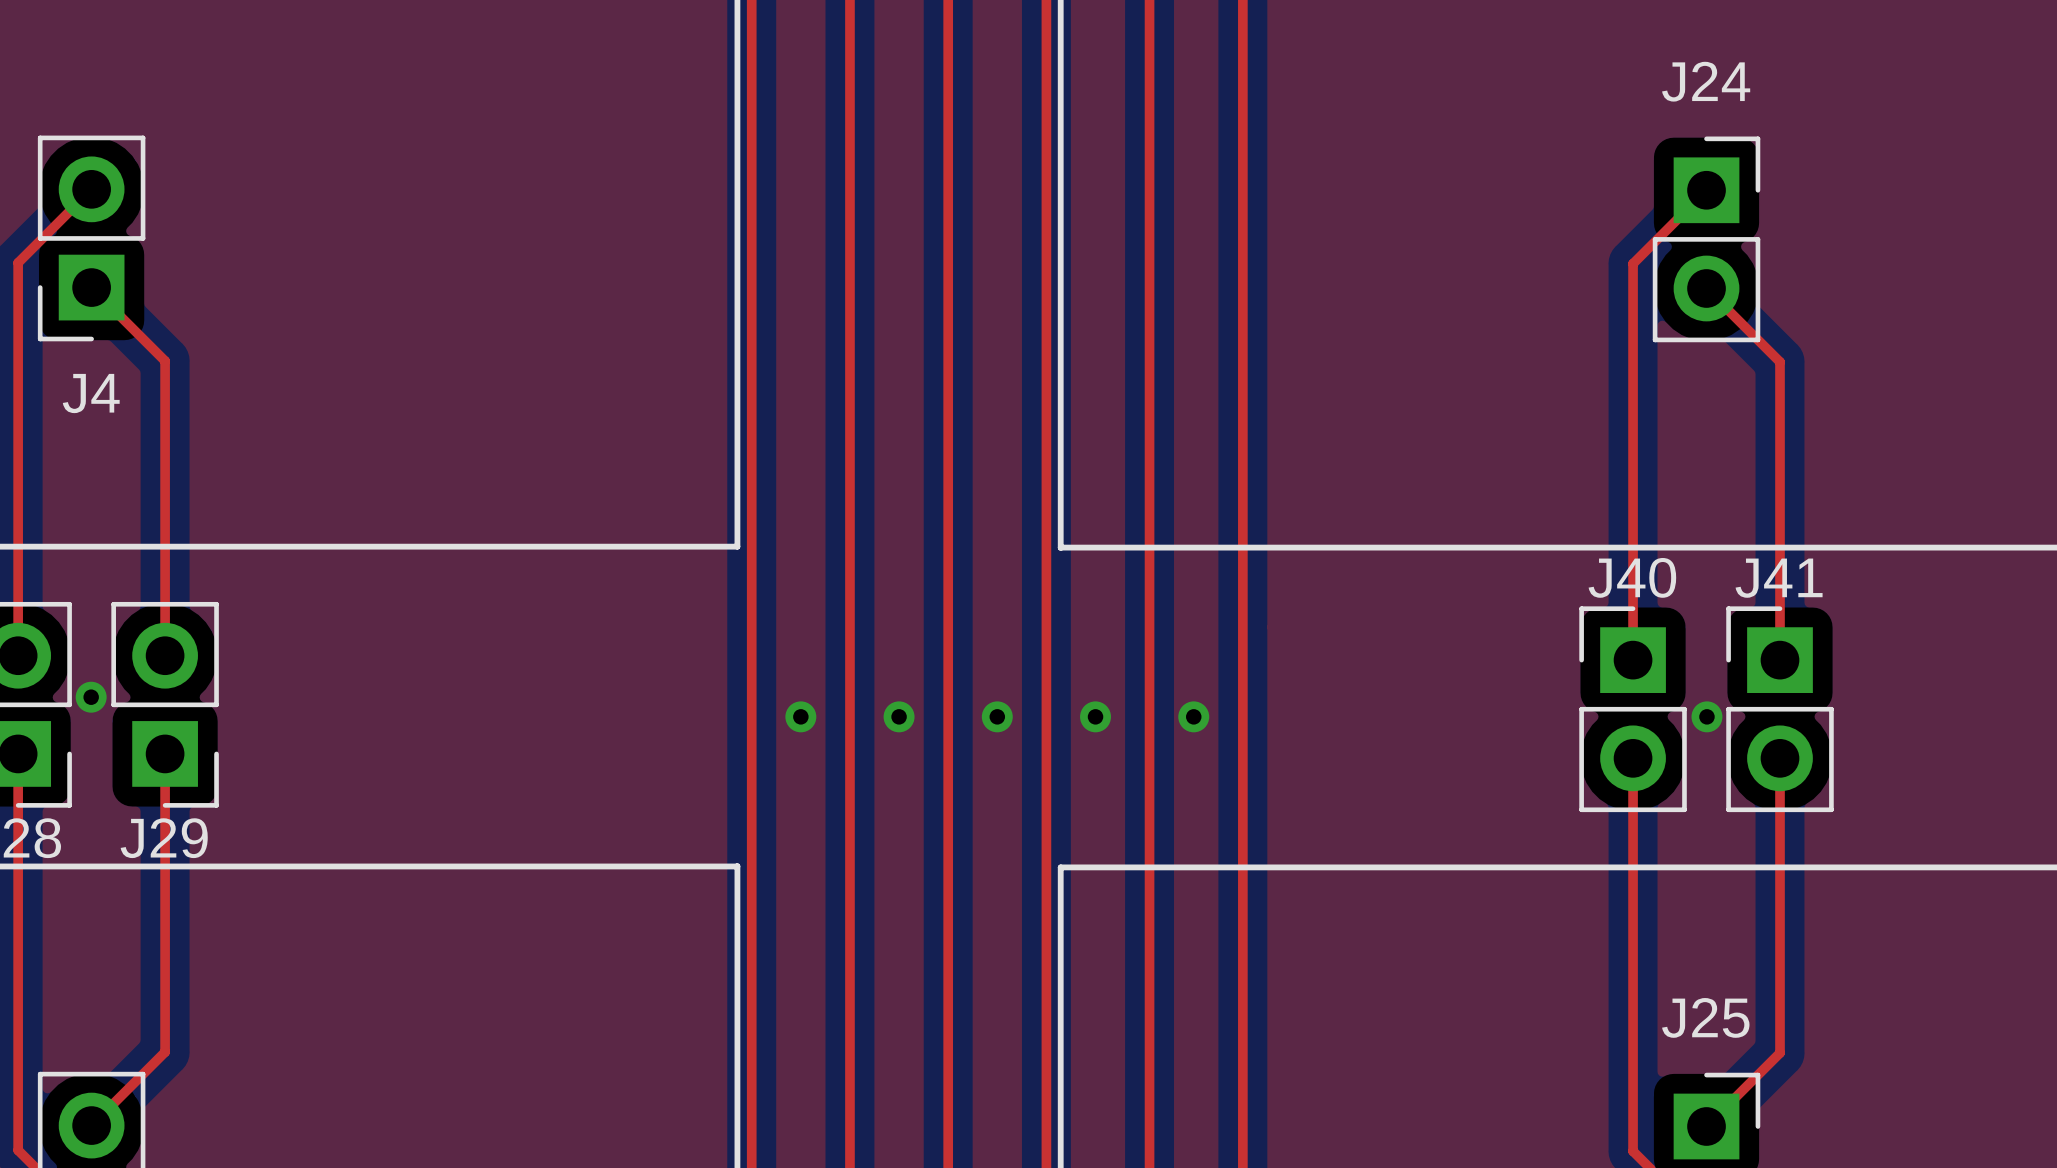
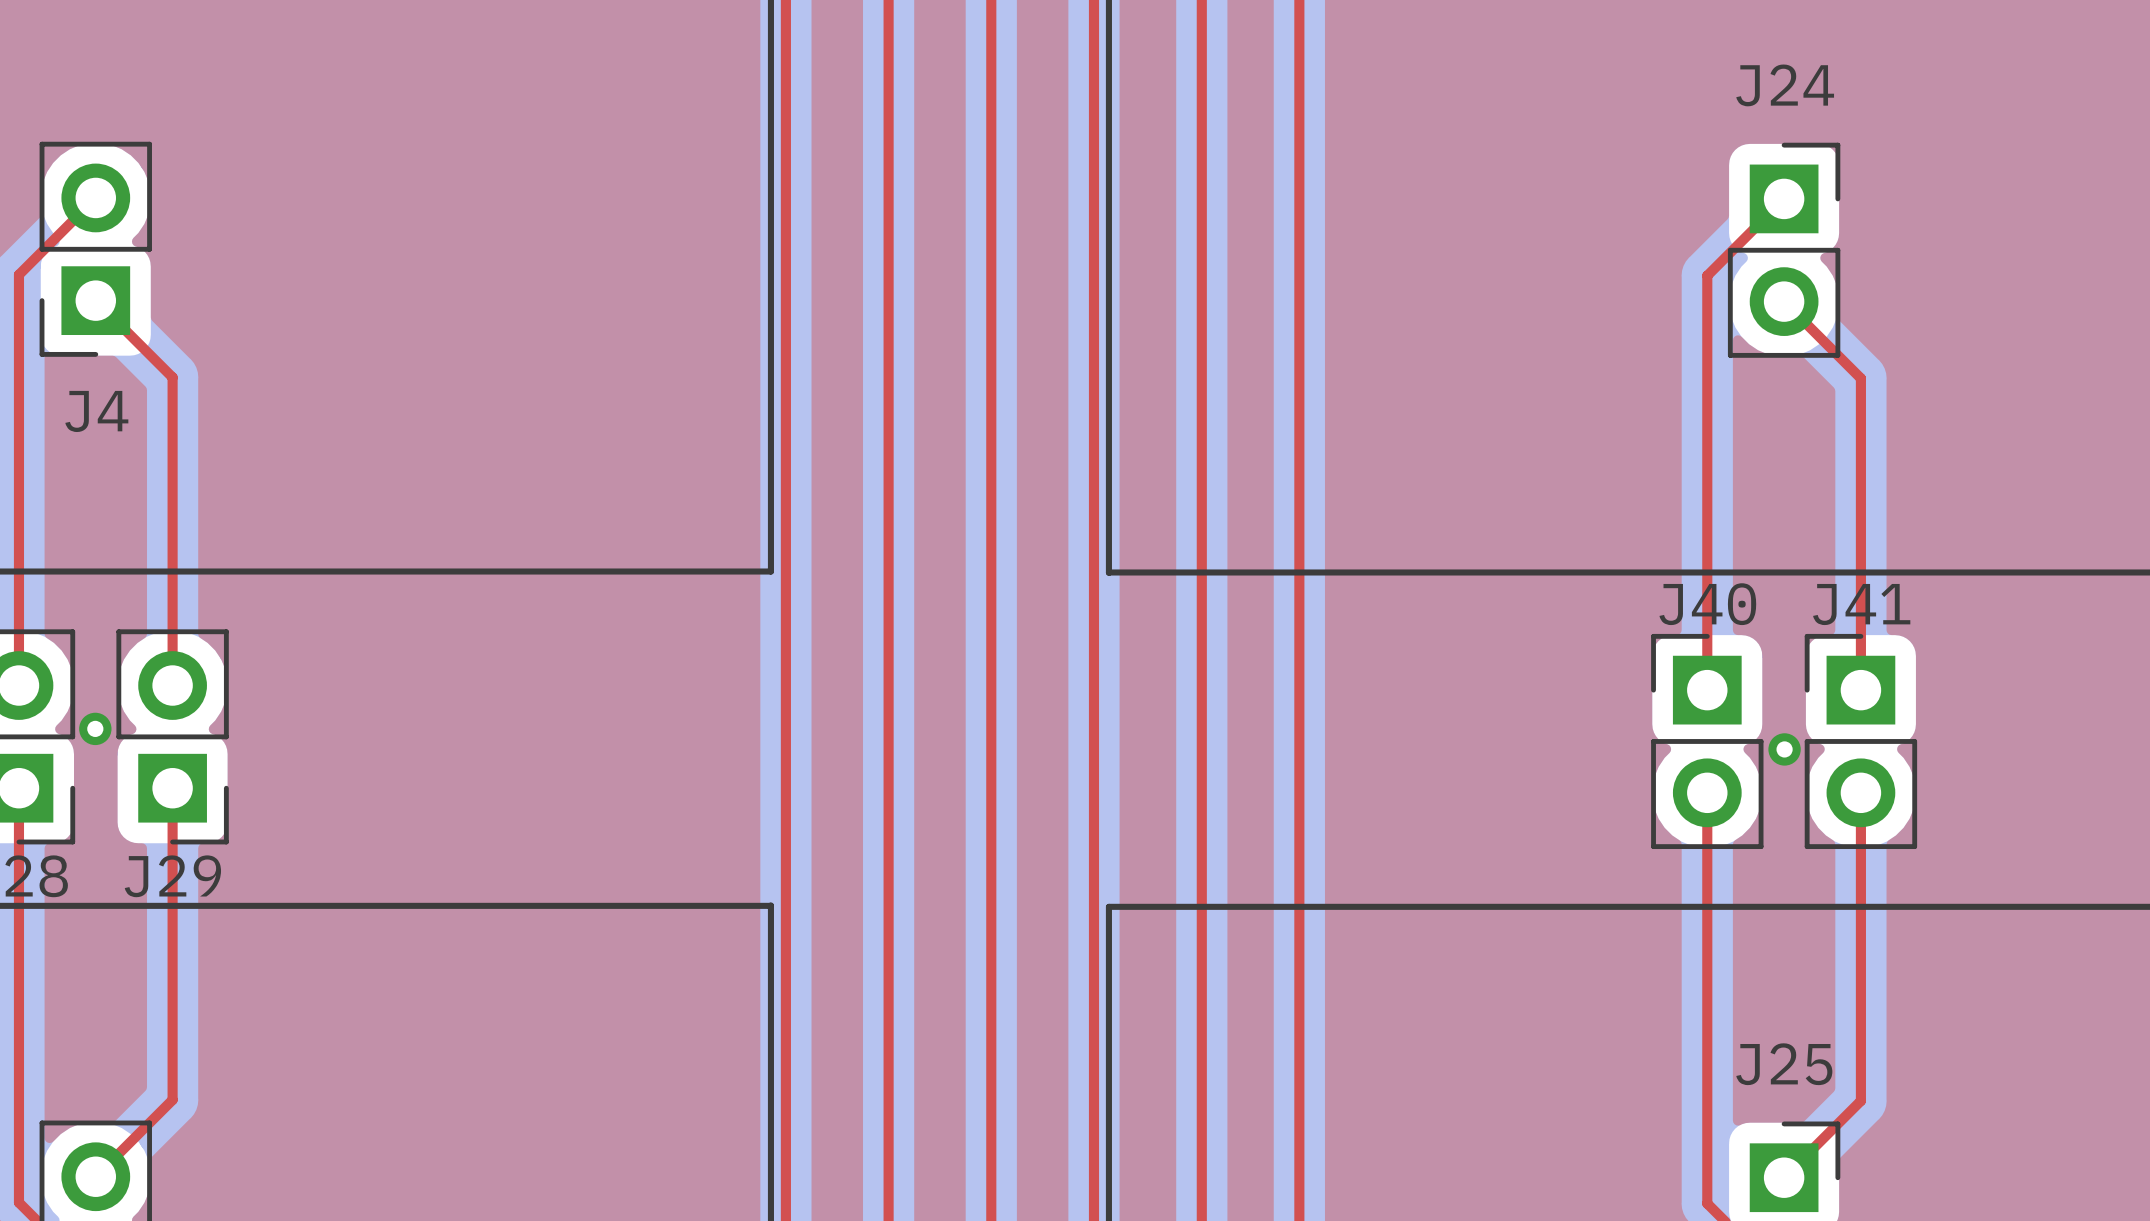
via: (800, 716) -> none
via: (899, 716) -> none
via: (997, 716) -> none
via: (1095, 716) -> none
via: (1193, 716) -> none

